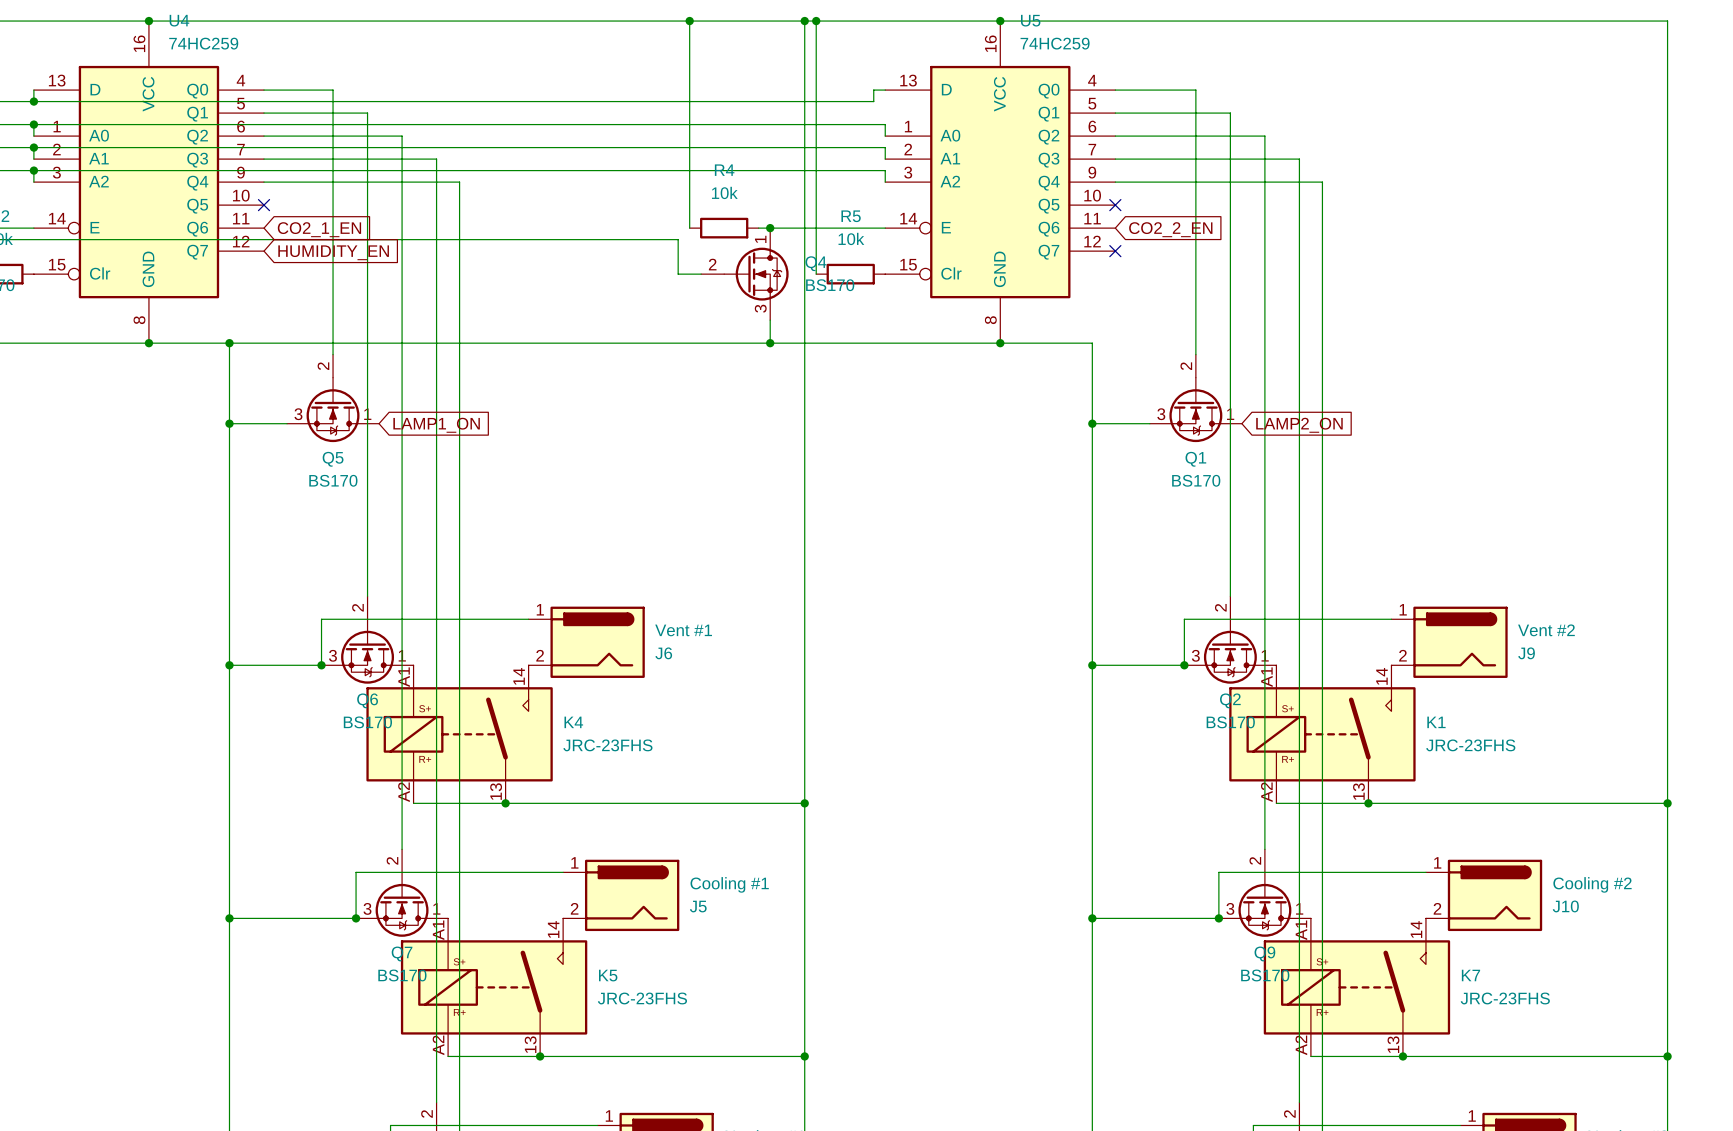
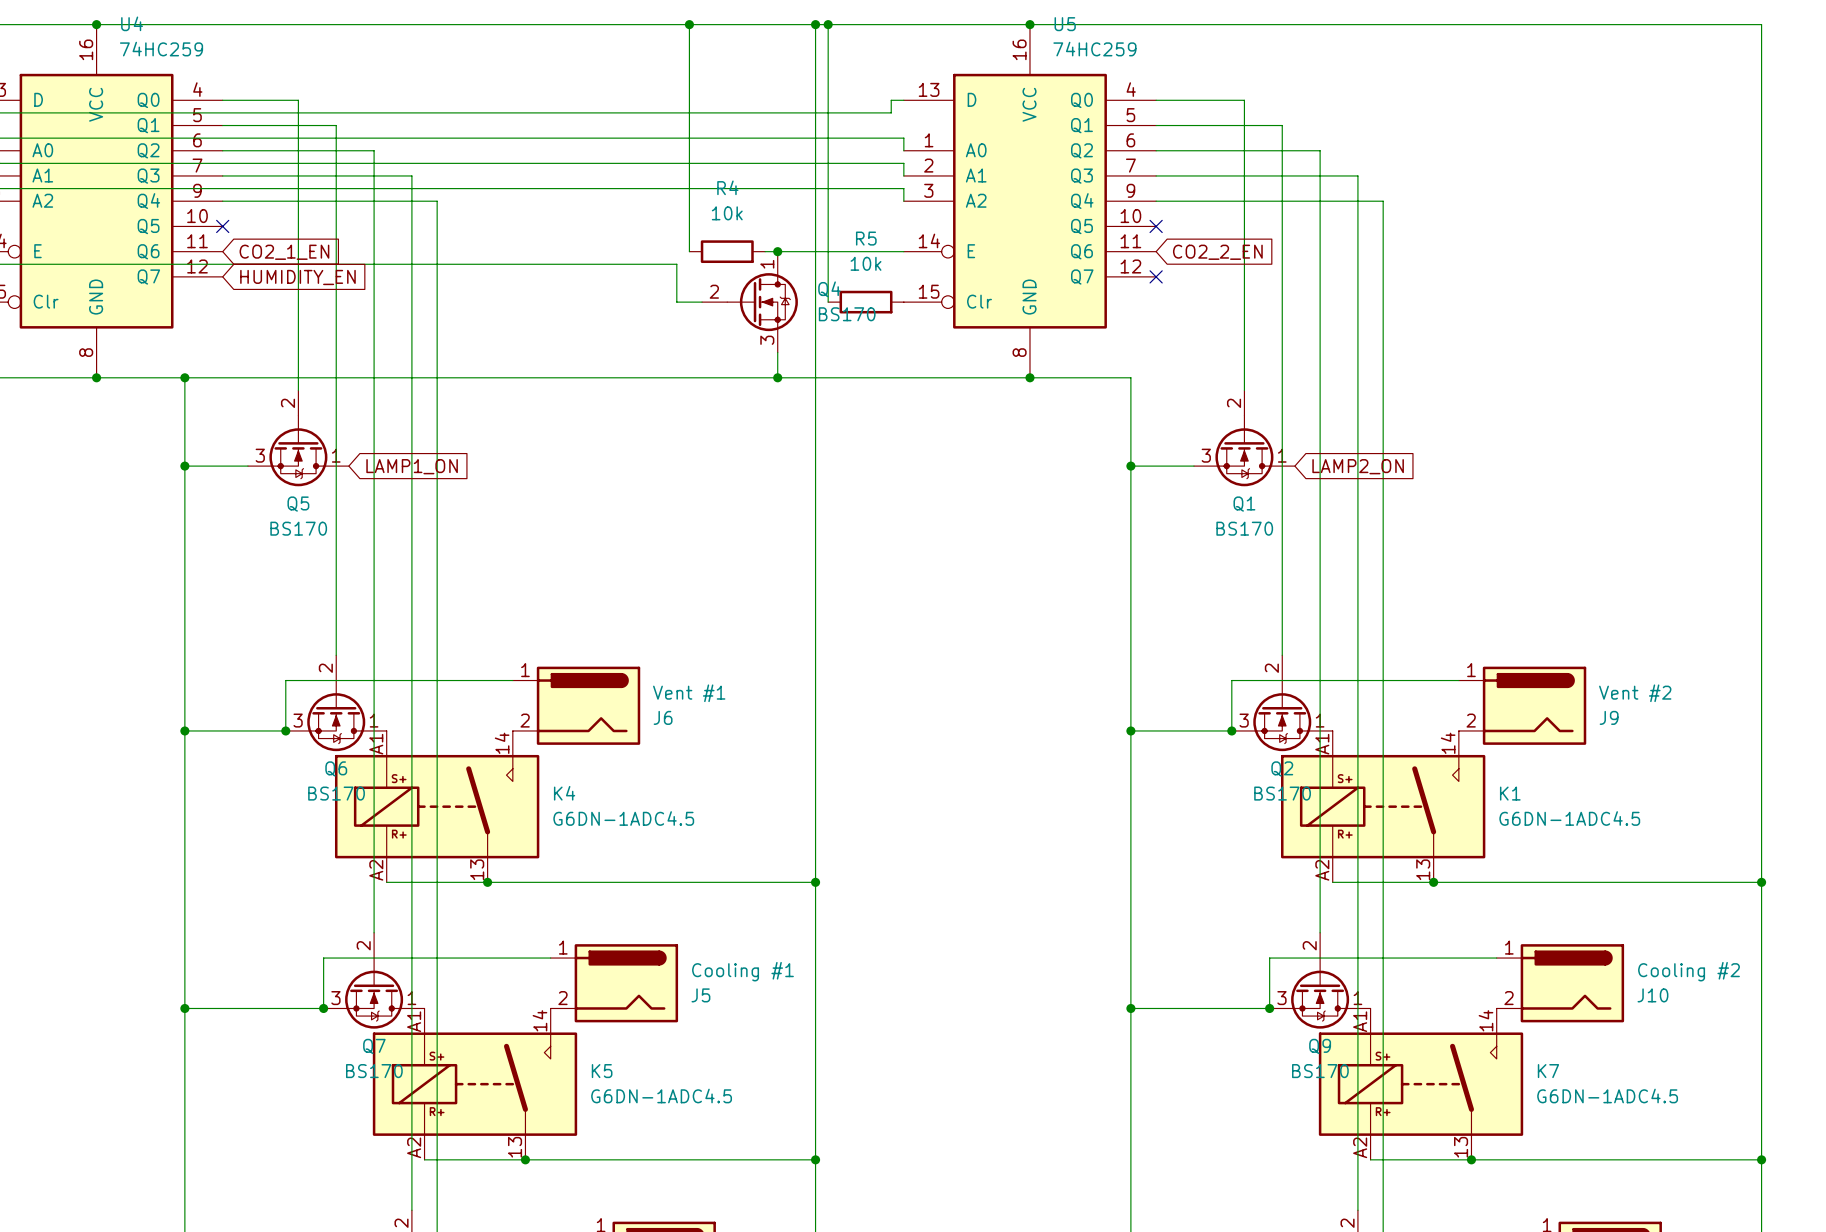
K4 value: JRC-23FHS (607, 745) -> G6DN-1ADC4.5 (623, 818)
K1 value: JRC-23FHS (1470, 745) -> G6DN-1ADC4.5 (1569, 818)
K5 value: JRC-23FHS (642, 998) -> G6DN-1ADC4.5 (661, 1096)
K7 value: JRC-23FHS (1505, 998) -> G6DN-1ADC4.5 (1607, 1096)

